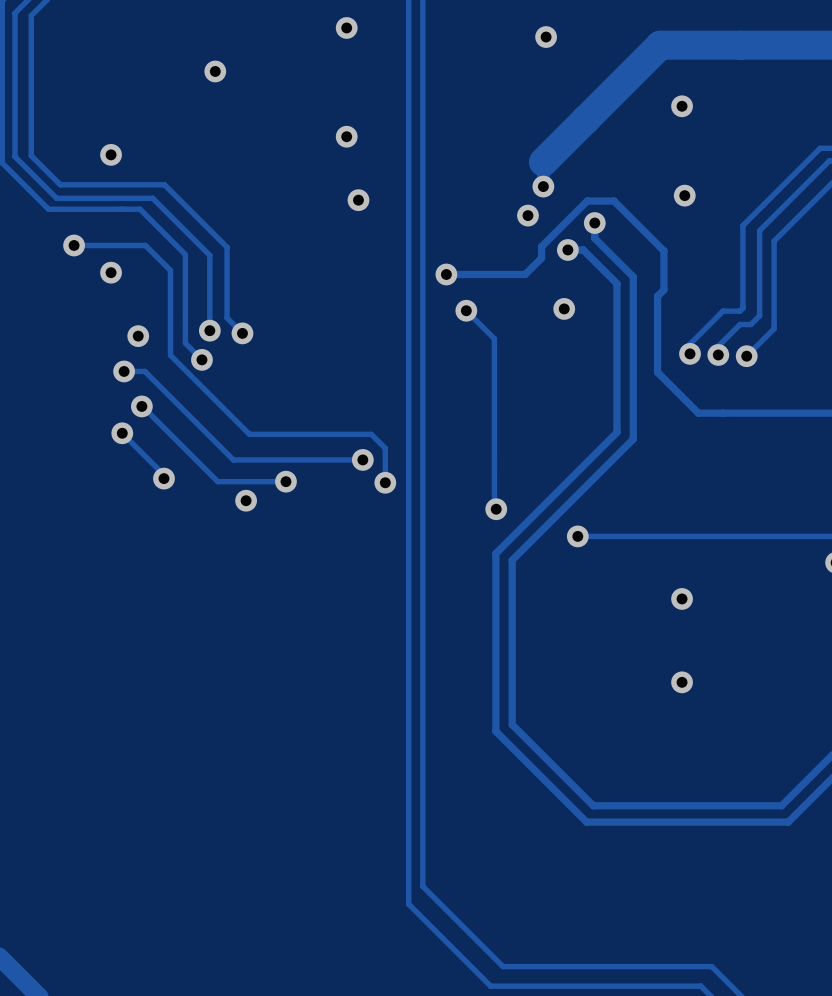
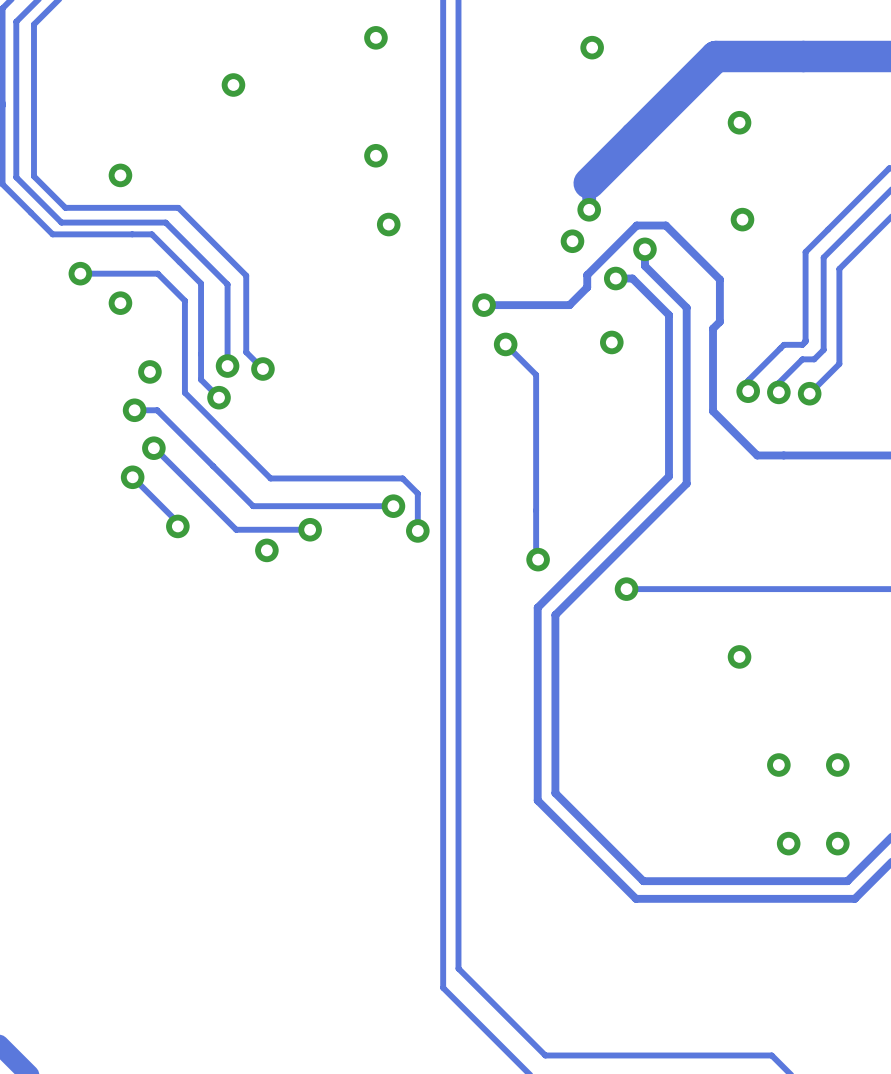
via position: (682, 682) -> (778, 765)
via: none -> (837, 765)
via: none -> (788, 843)
via: none -> (837, 843)

